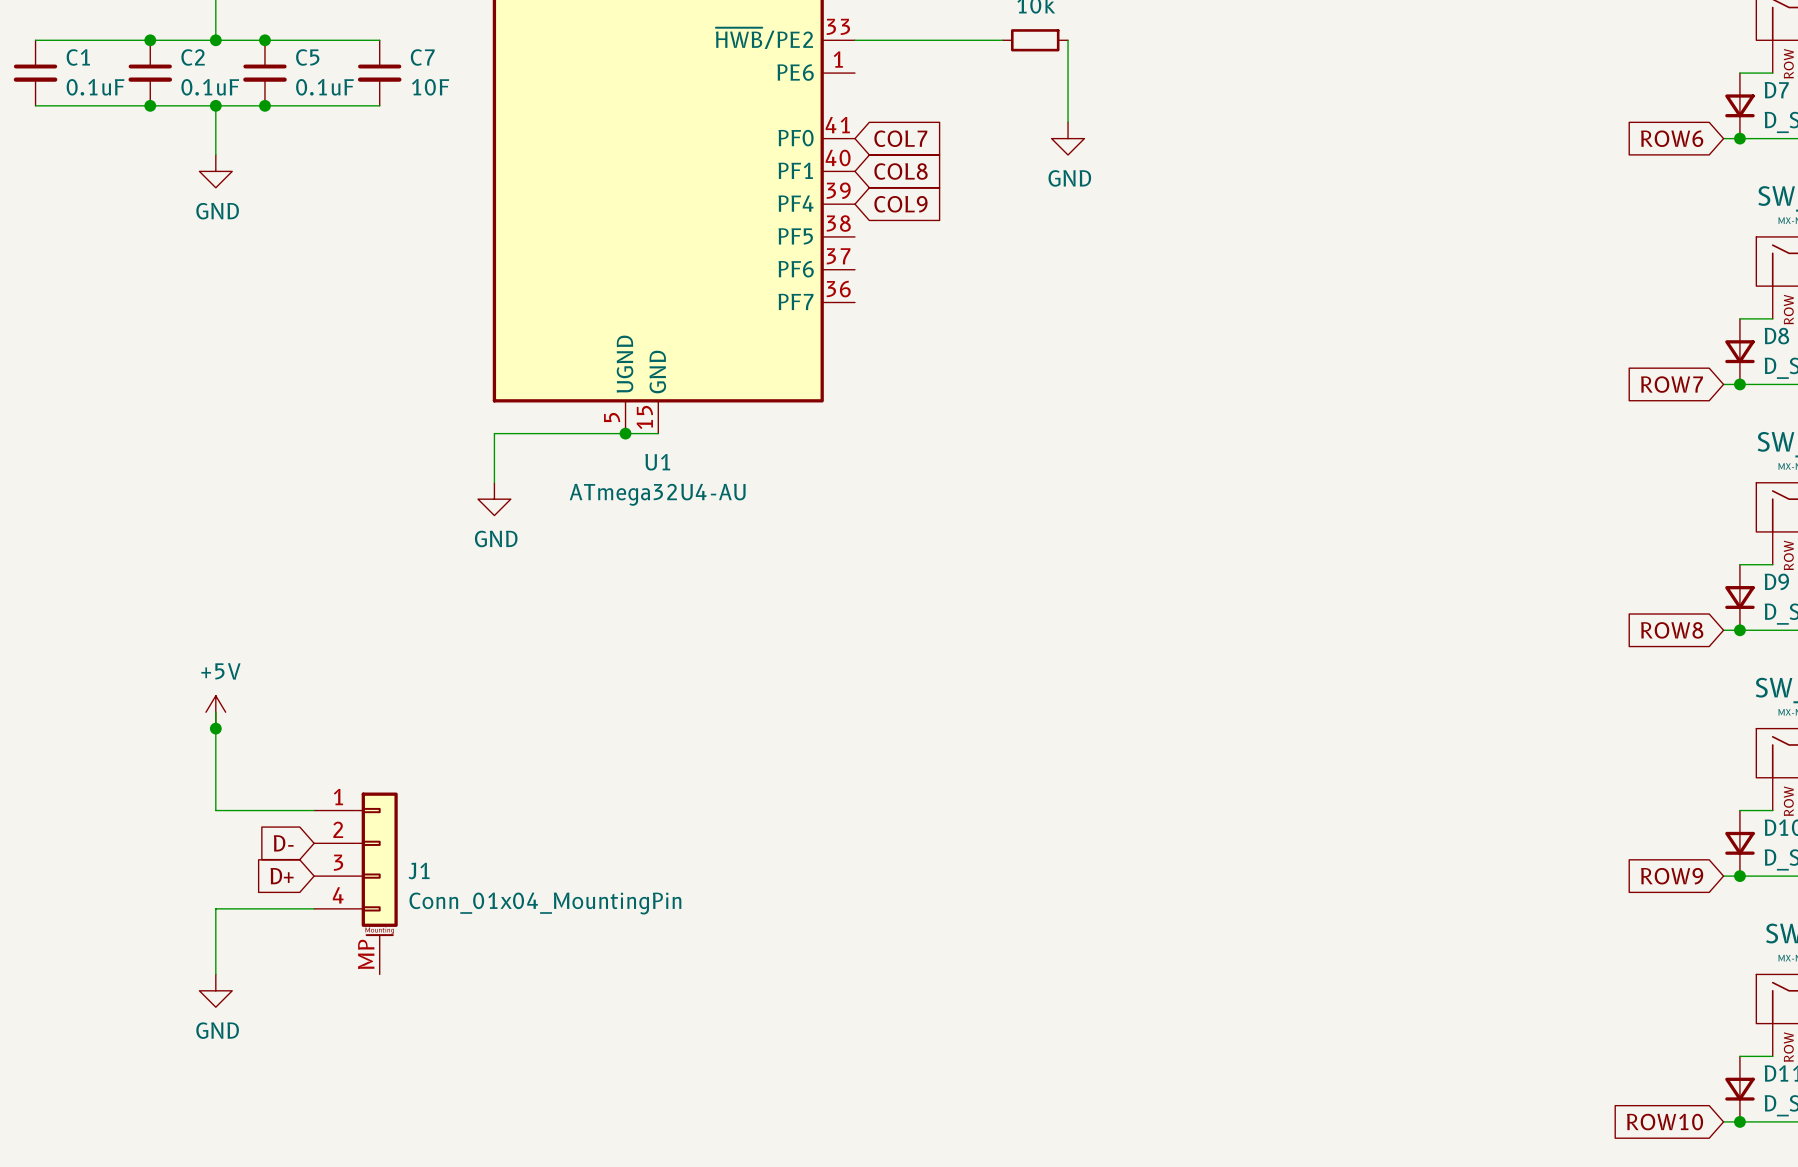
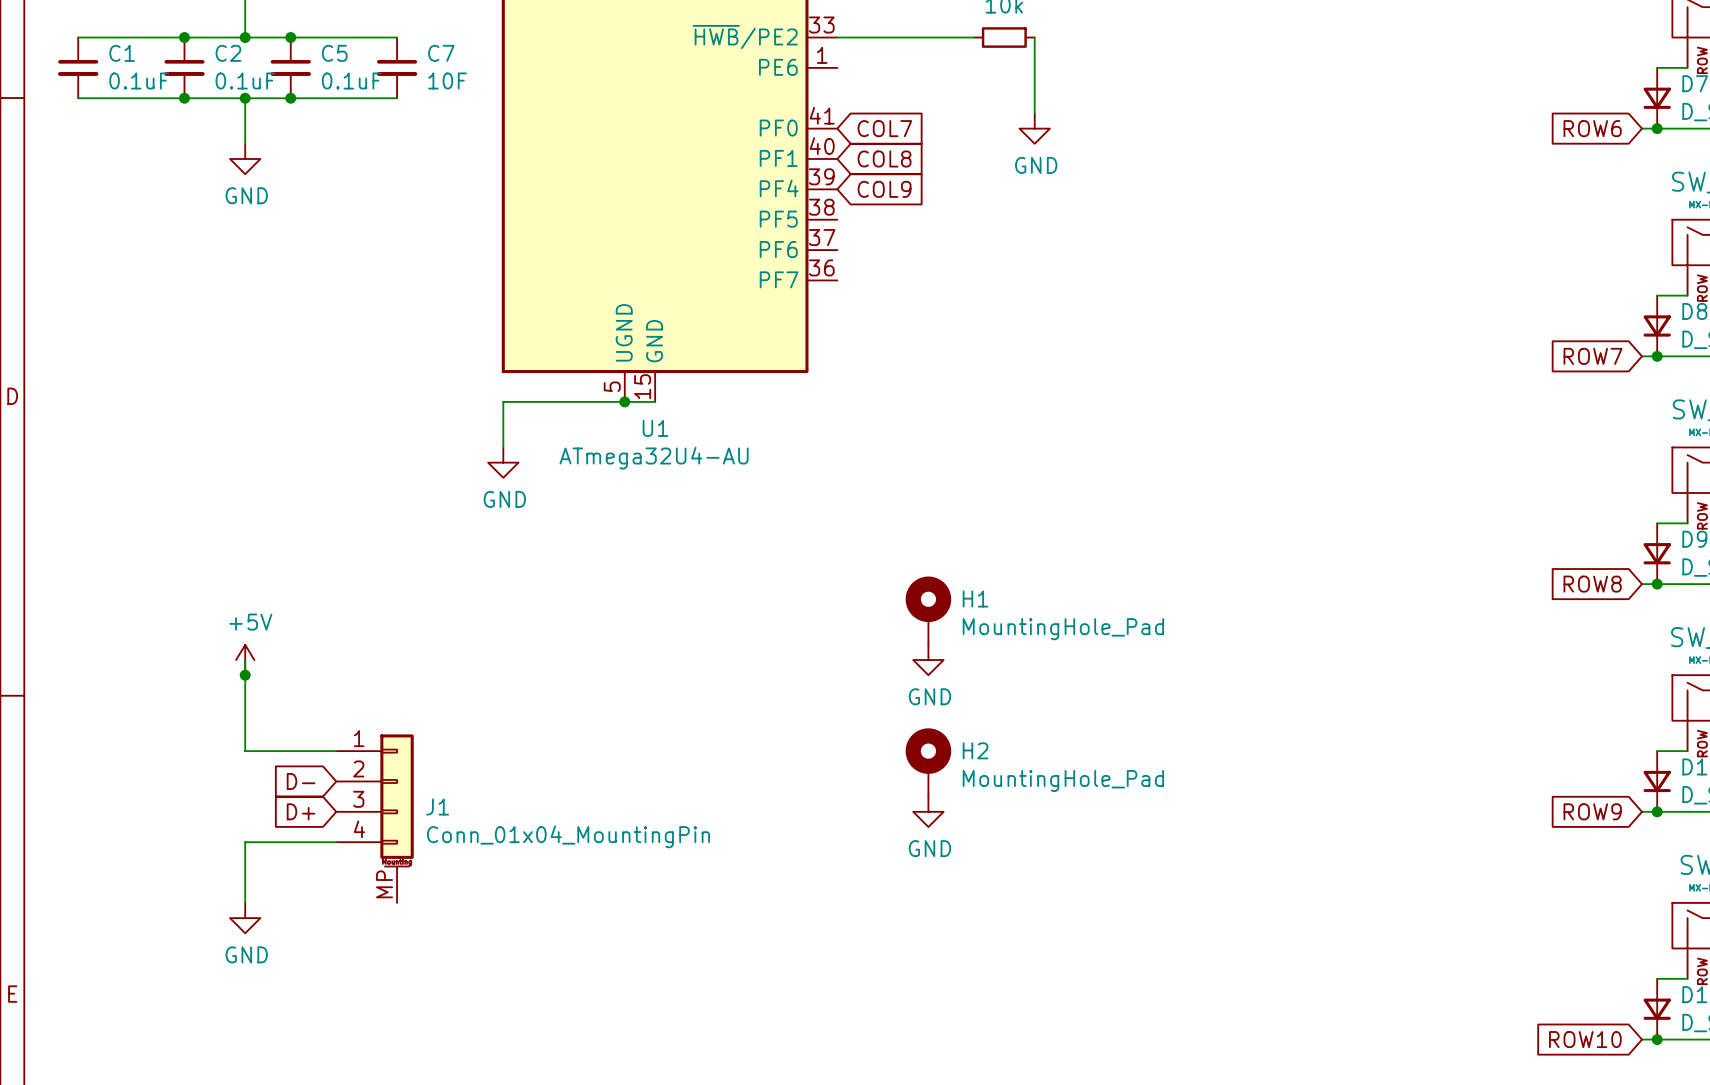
H1: none -> MountingHole_Pad (928, 610)
power symbol: none -> GND (928, 660)
H2: none -> MountingHole_Pad (928, 762)
power symbol: none -> GND (928, 811)

